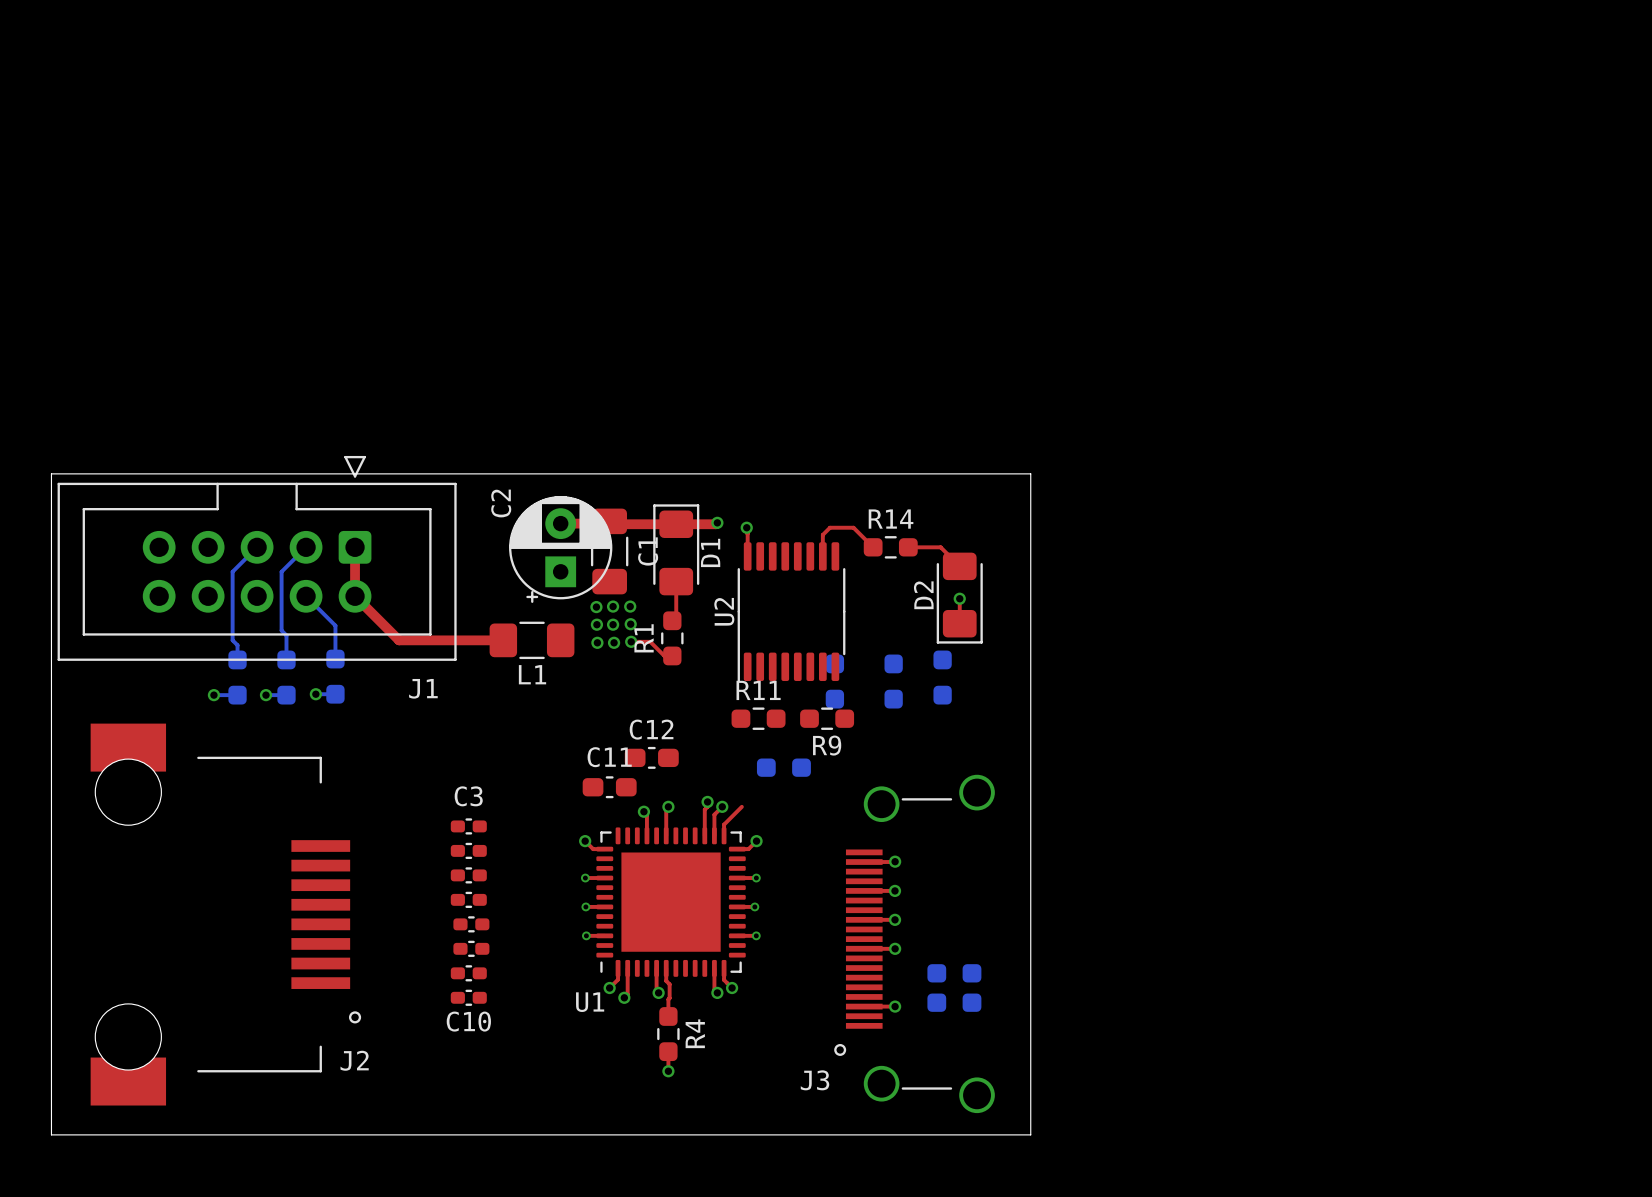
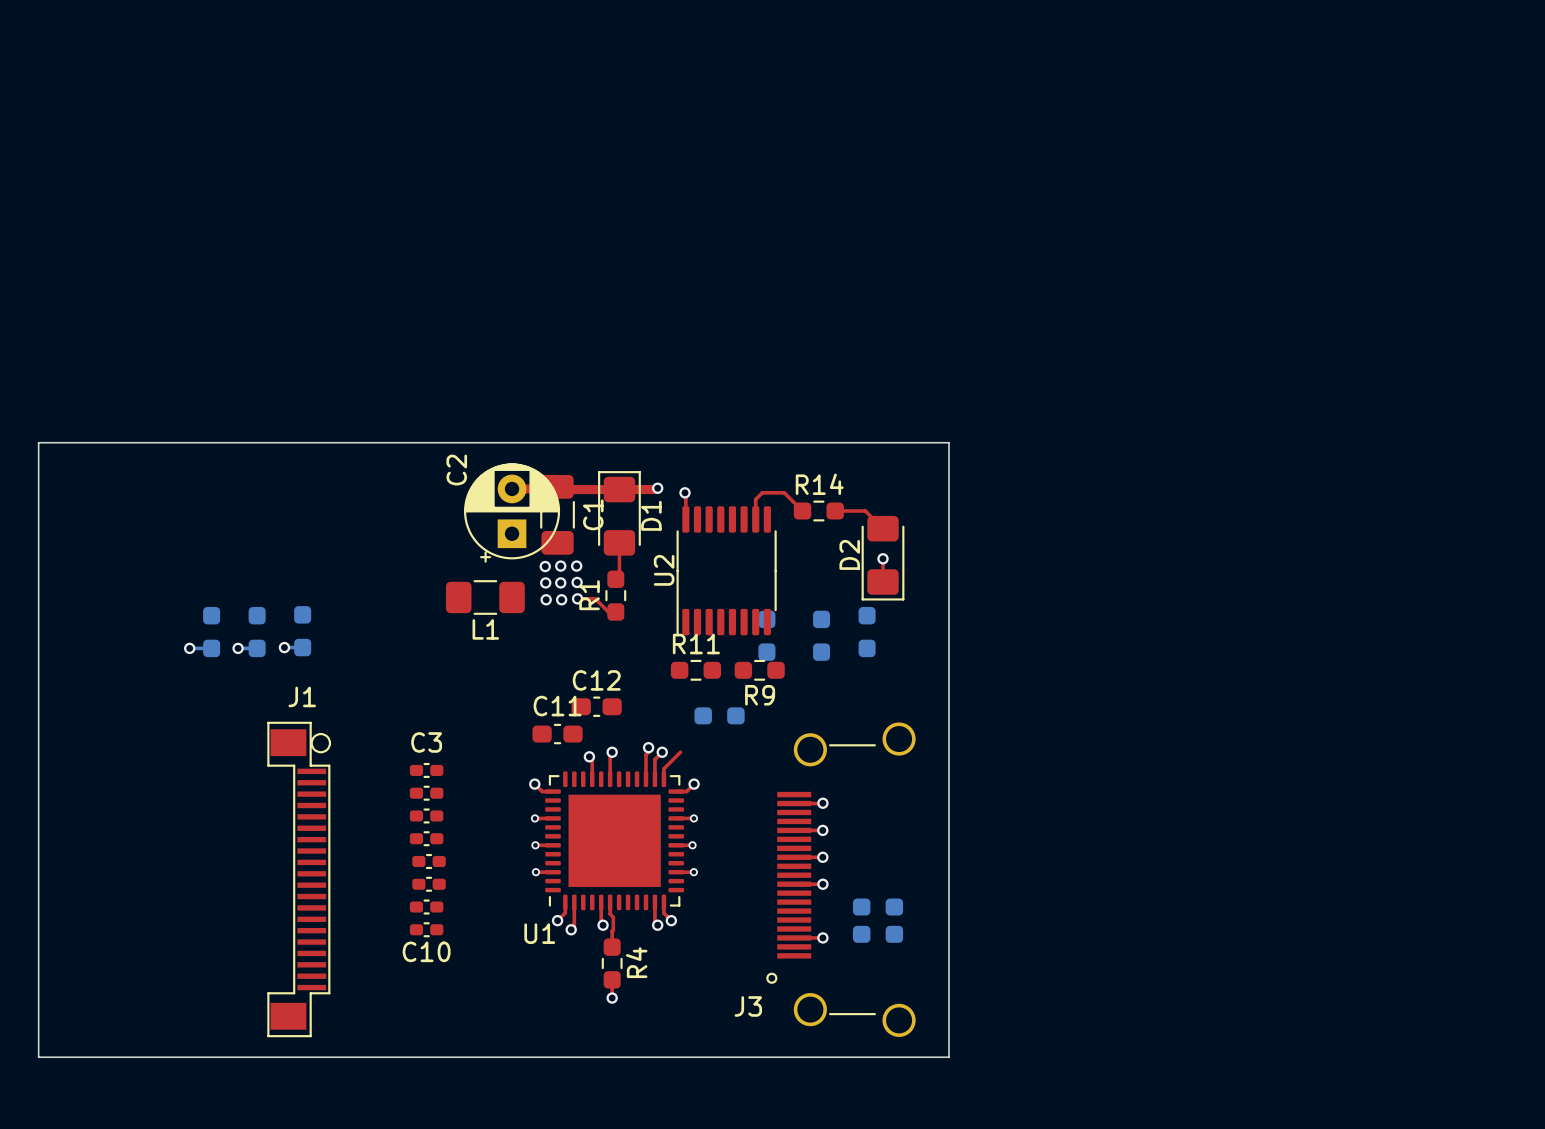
J1 footprint: [57, 455, 457, 661] -> [267, 721, 331, 1038]
bottom track: (257, 547) (232, 571) (232, 640) (237, 645) (237, 659) -> none
bottom track: (306, 547) (281, 571) (281, 630) (286, 635) (286, 659) -> none
top track: (355, 547) (355, 596) (399, 640) (503, 640) -> none
bottom track: (306, 596) (335, 625) (335, 659) -> none
J1 name position: J1 (423, 688) -> J1 (302, 696)
drawing: none -> [310, 732, 332, 754]
J2: (225, 914) -> none

